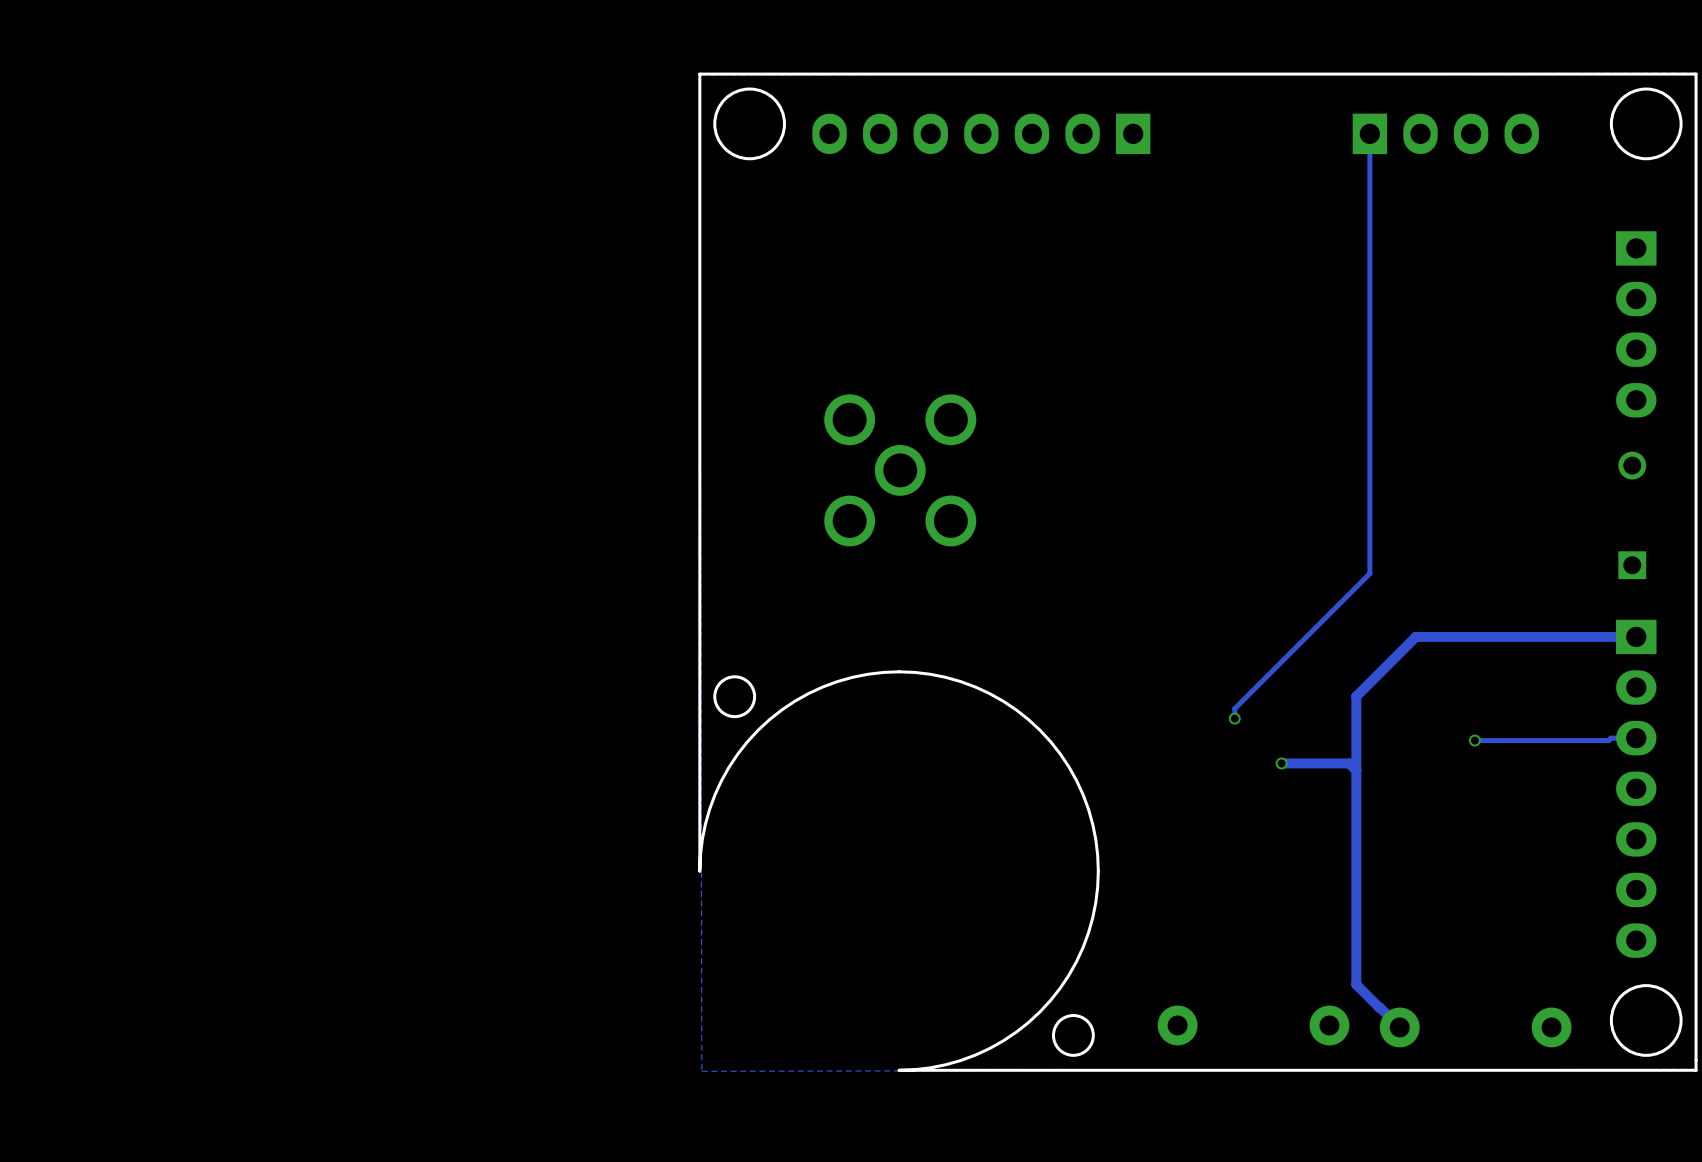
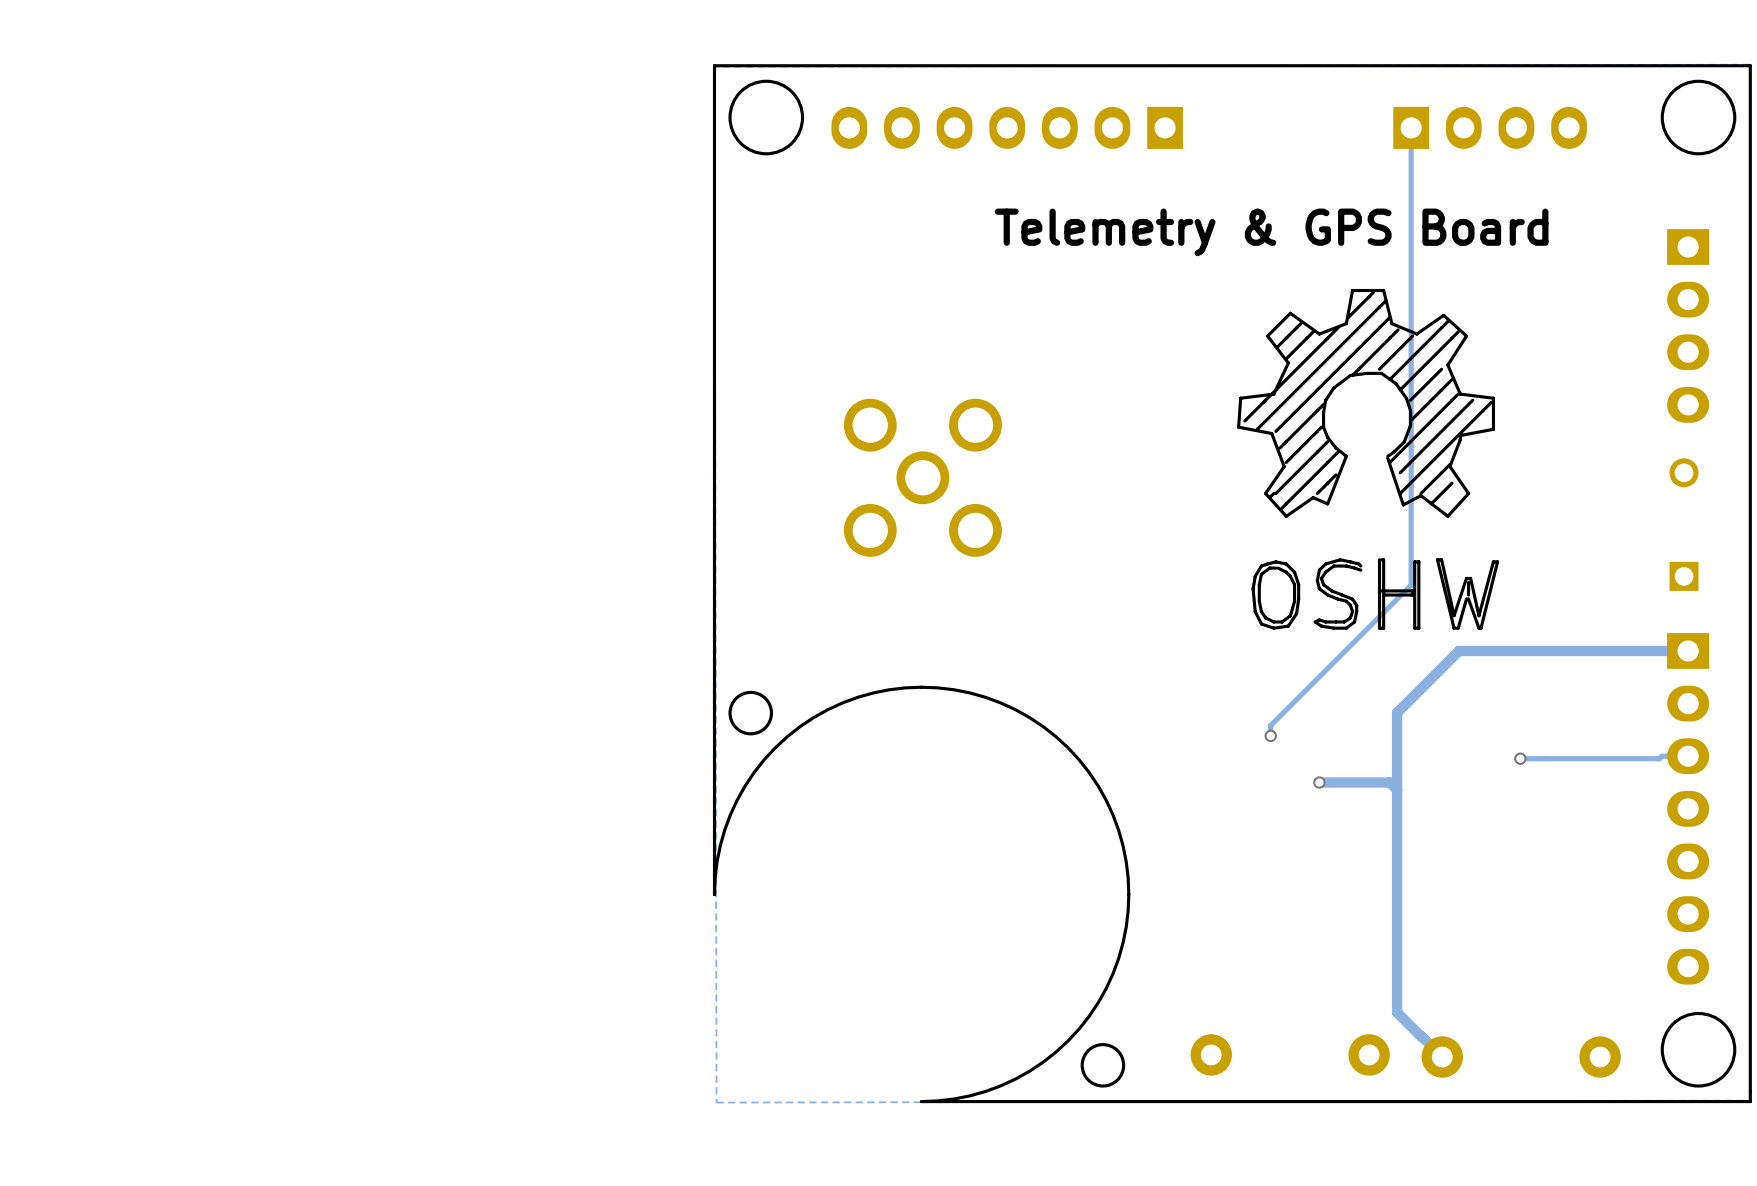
text: none -> Telemetry & GPS Board (1271, 232)
drawing: none -> [1237, 288, 1500, 630]

